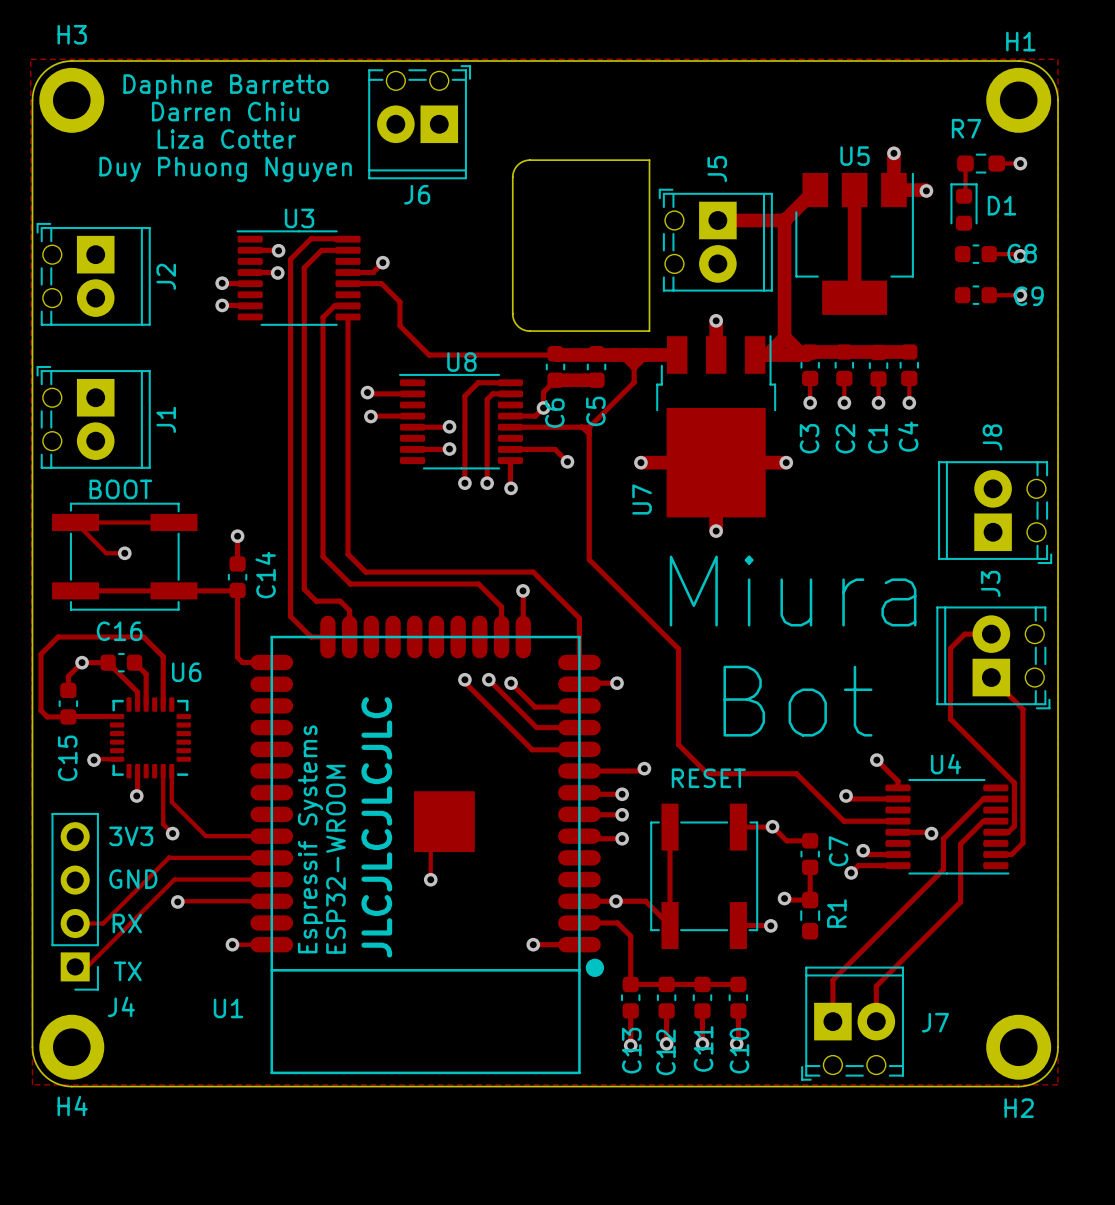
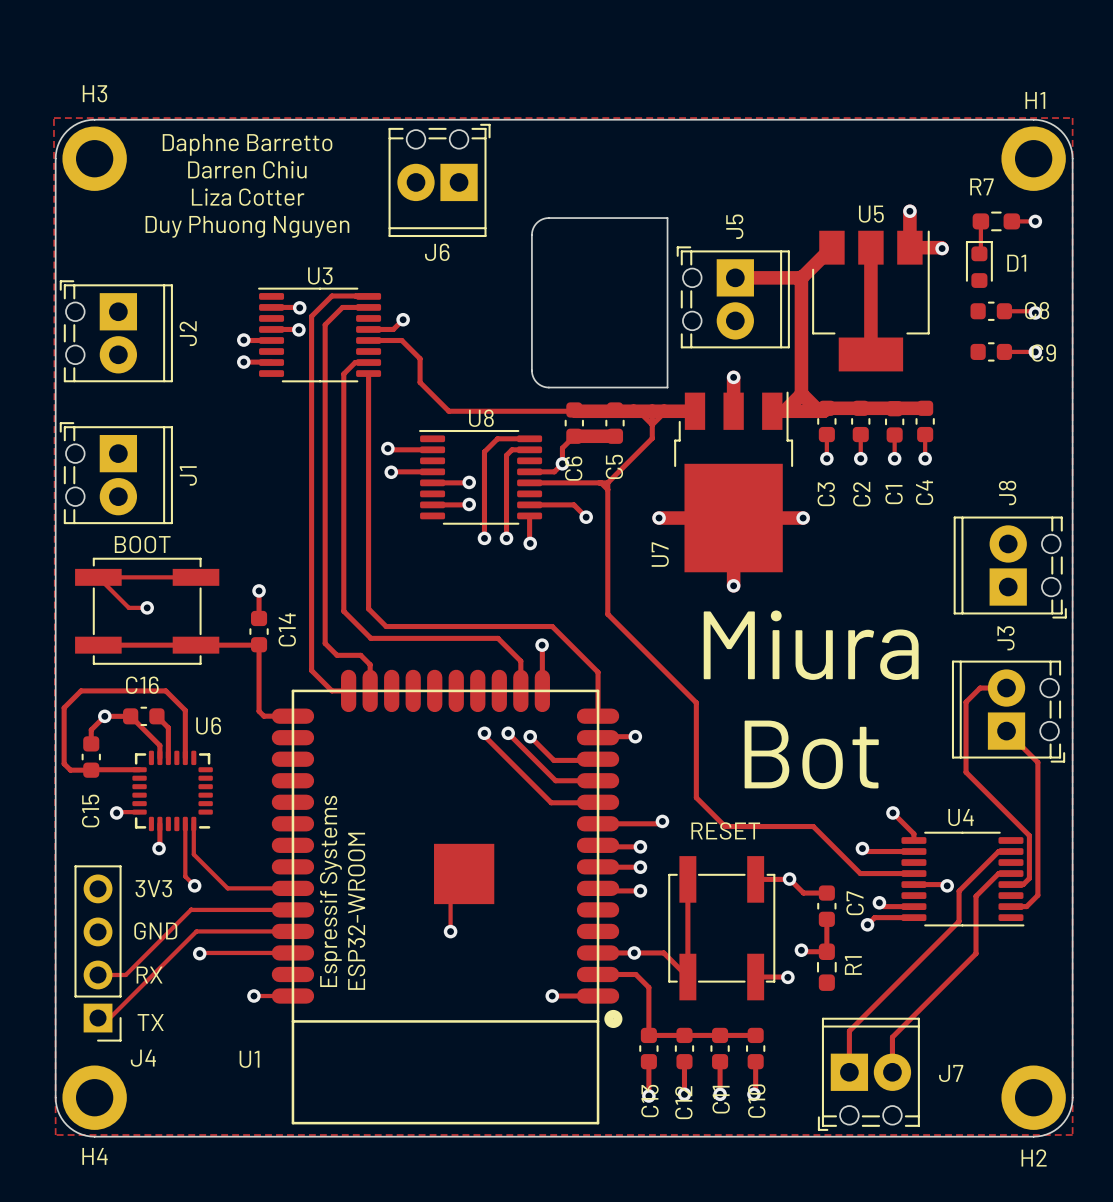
text: JLCJLCJLCJLC (376, 827) -> none

